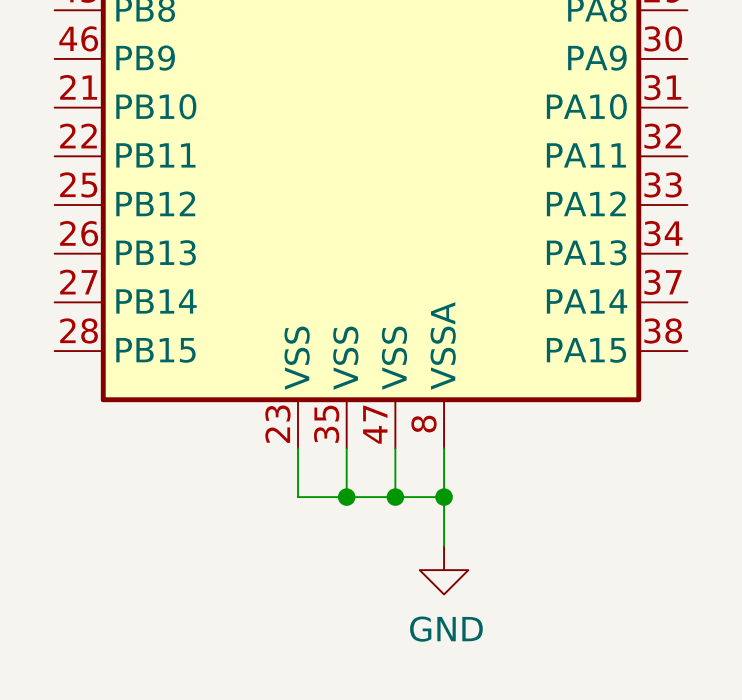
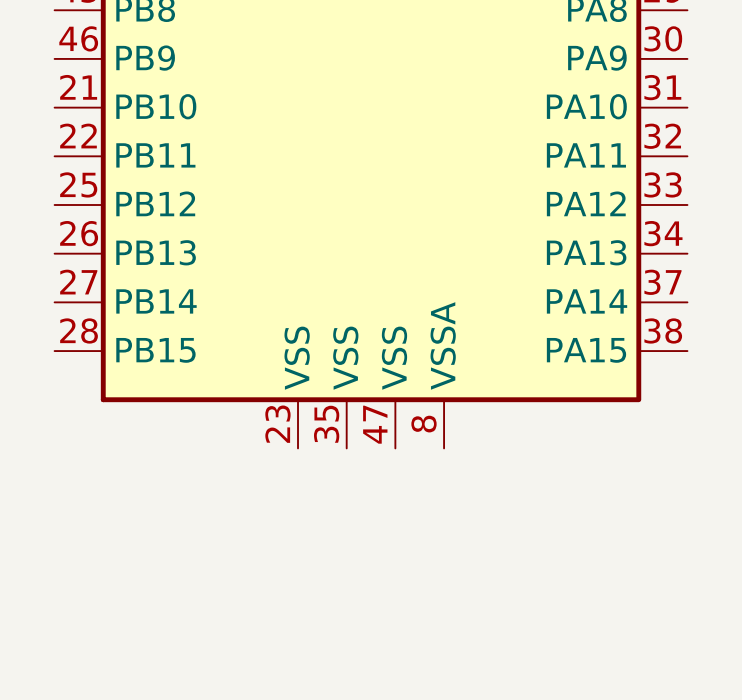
wire: (298, 448) (298, 497) (444, 497) -> none
wire: (346, 448) (346, 497) -> none
wire: (395, 448) (395, 497) -> none
wire: (444, 448) (444, 545) -> none
junction: (346, 497) -> none
junction: (395, 497) -> none
junction: (444, 497) -> none
power symbol: GND (444, 570) -> none

